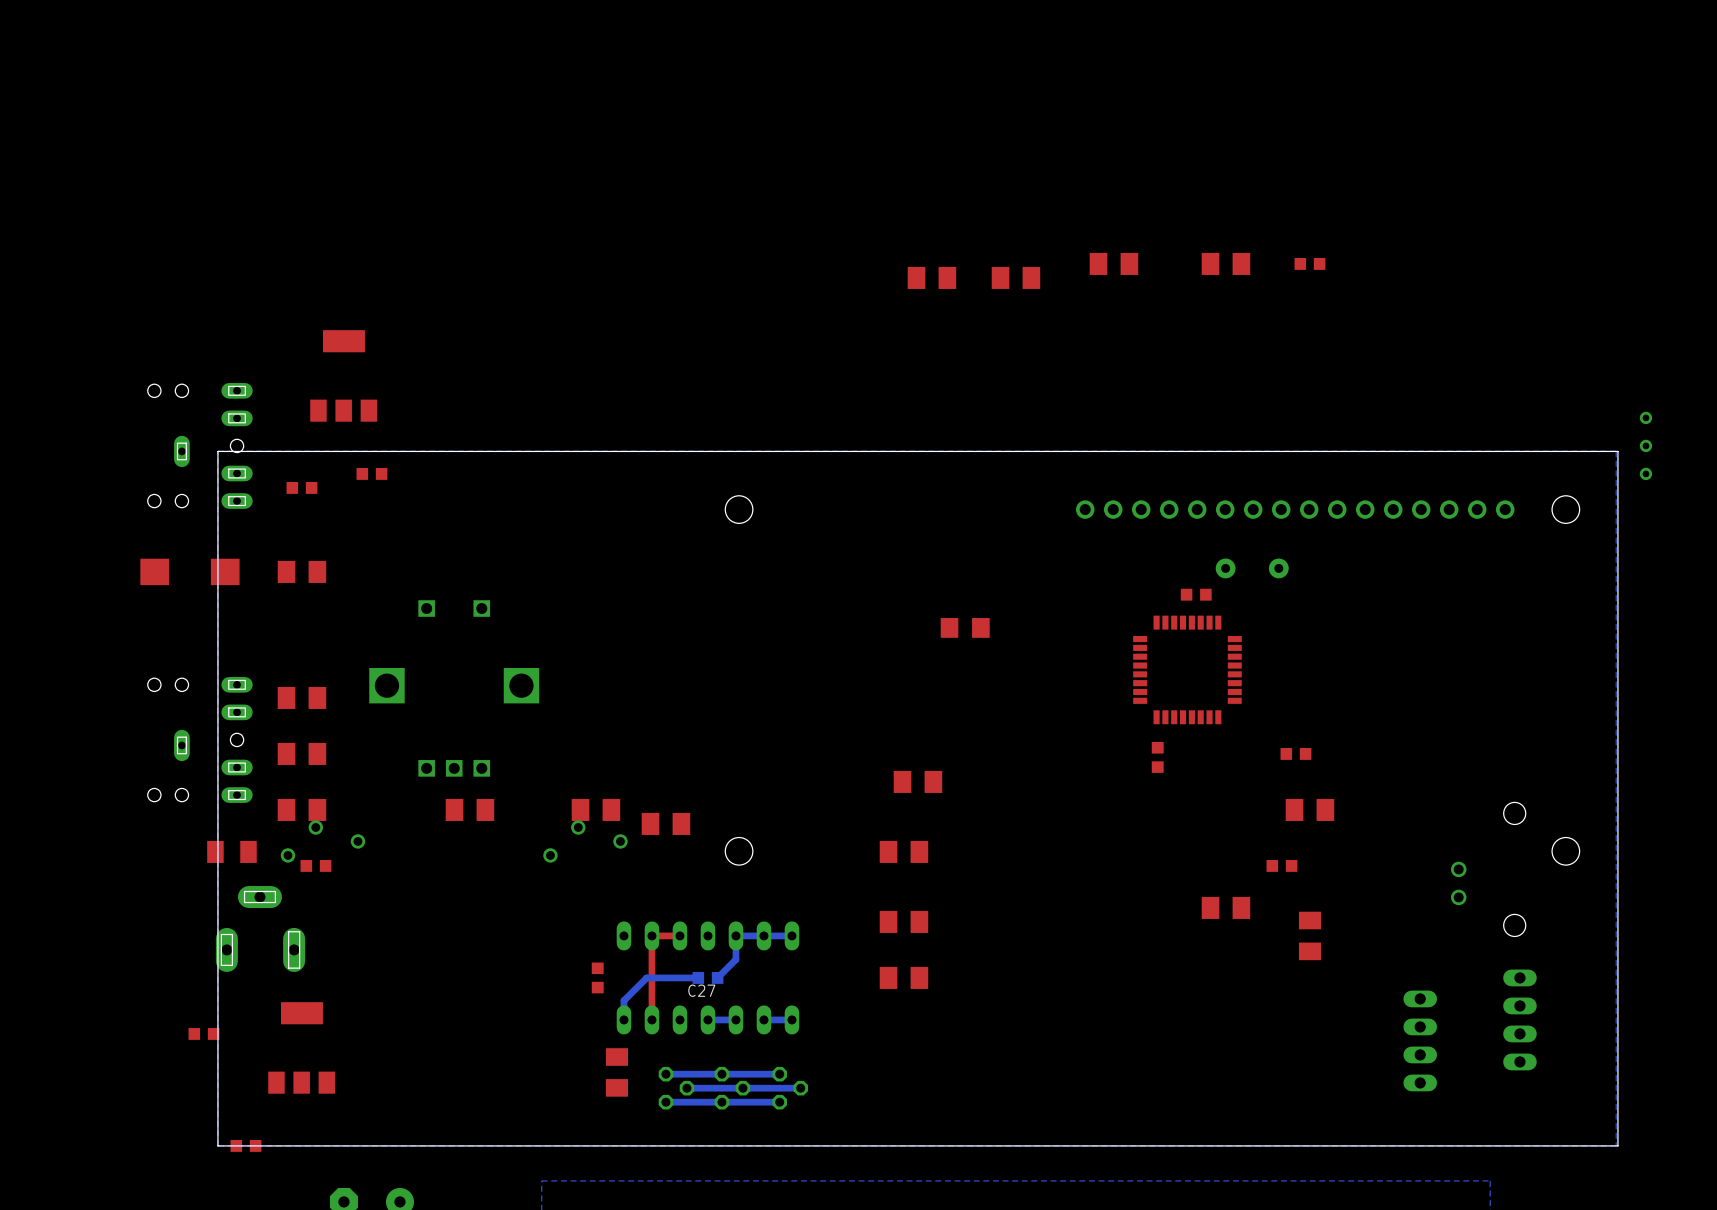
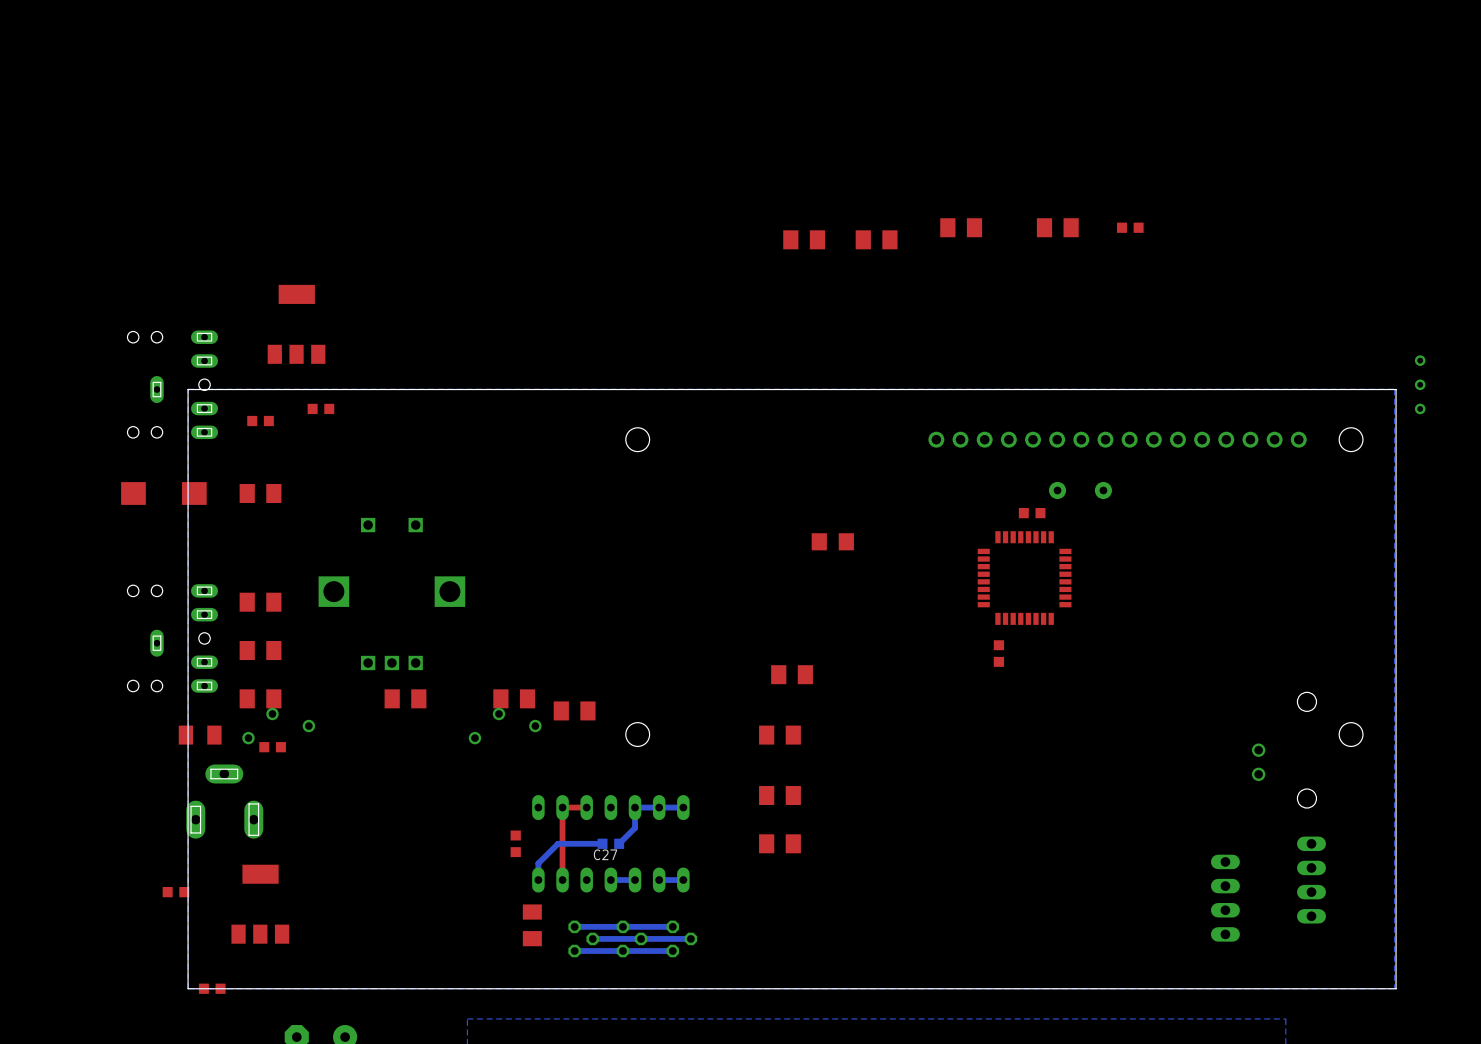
part: (1295, 753) -> none
part: (1309, 809) -> none
part: (1281, 865) -> none
part: (1225, 907) -> none
part: (1309, 935) -> none

